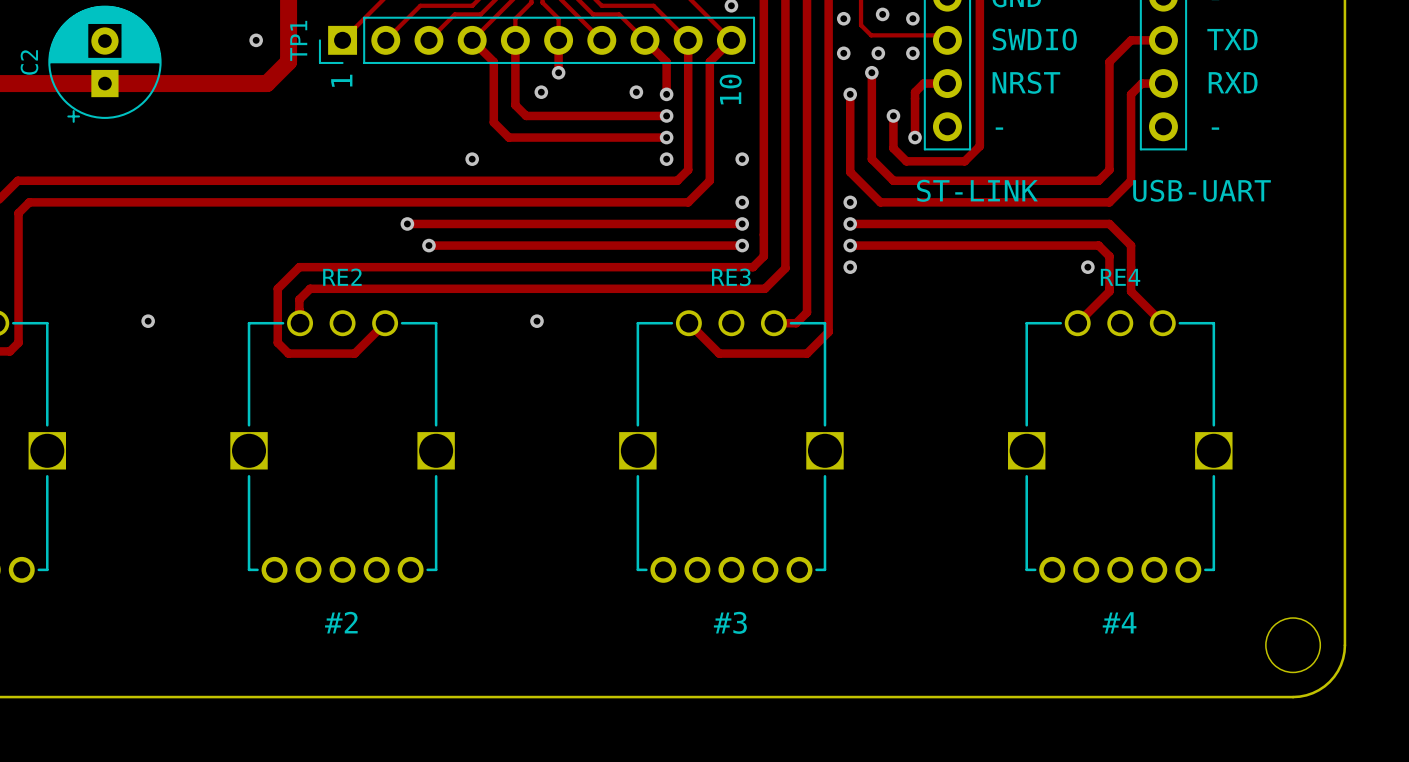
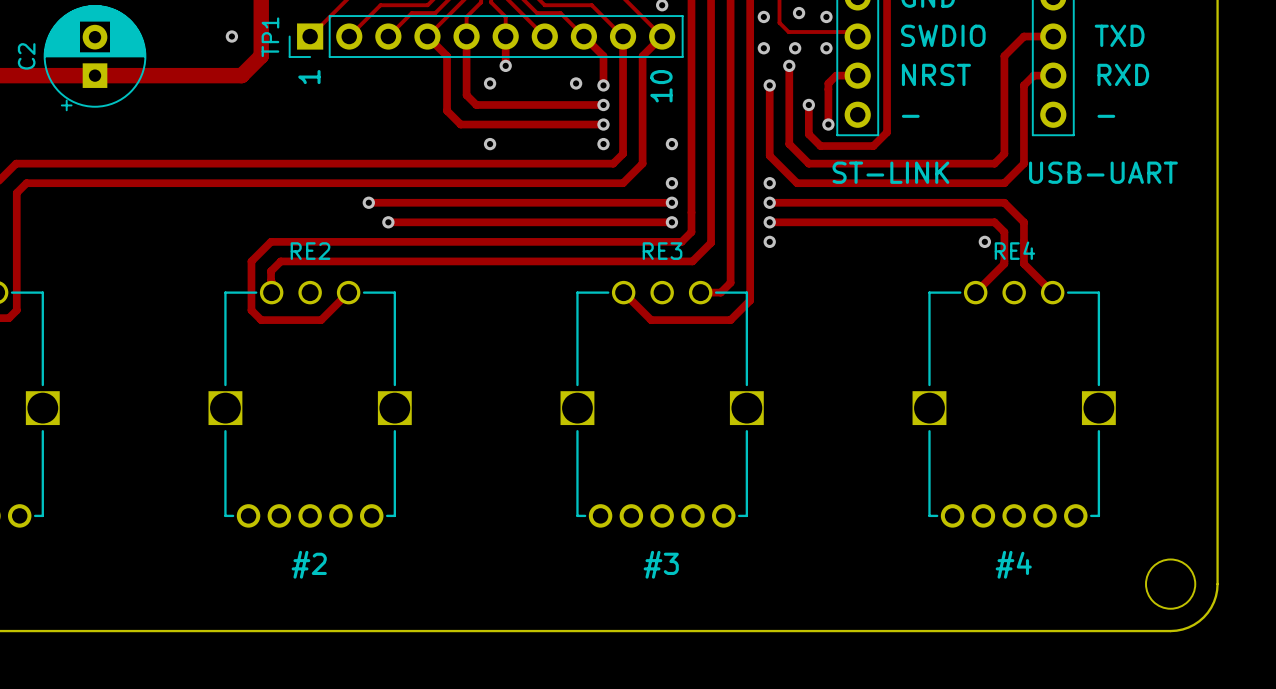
via position: (472, 159) -> (490, 144)
via: (148, 321) -> none
via: (537, 321) -> none

